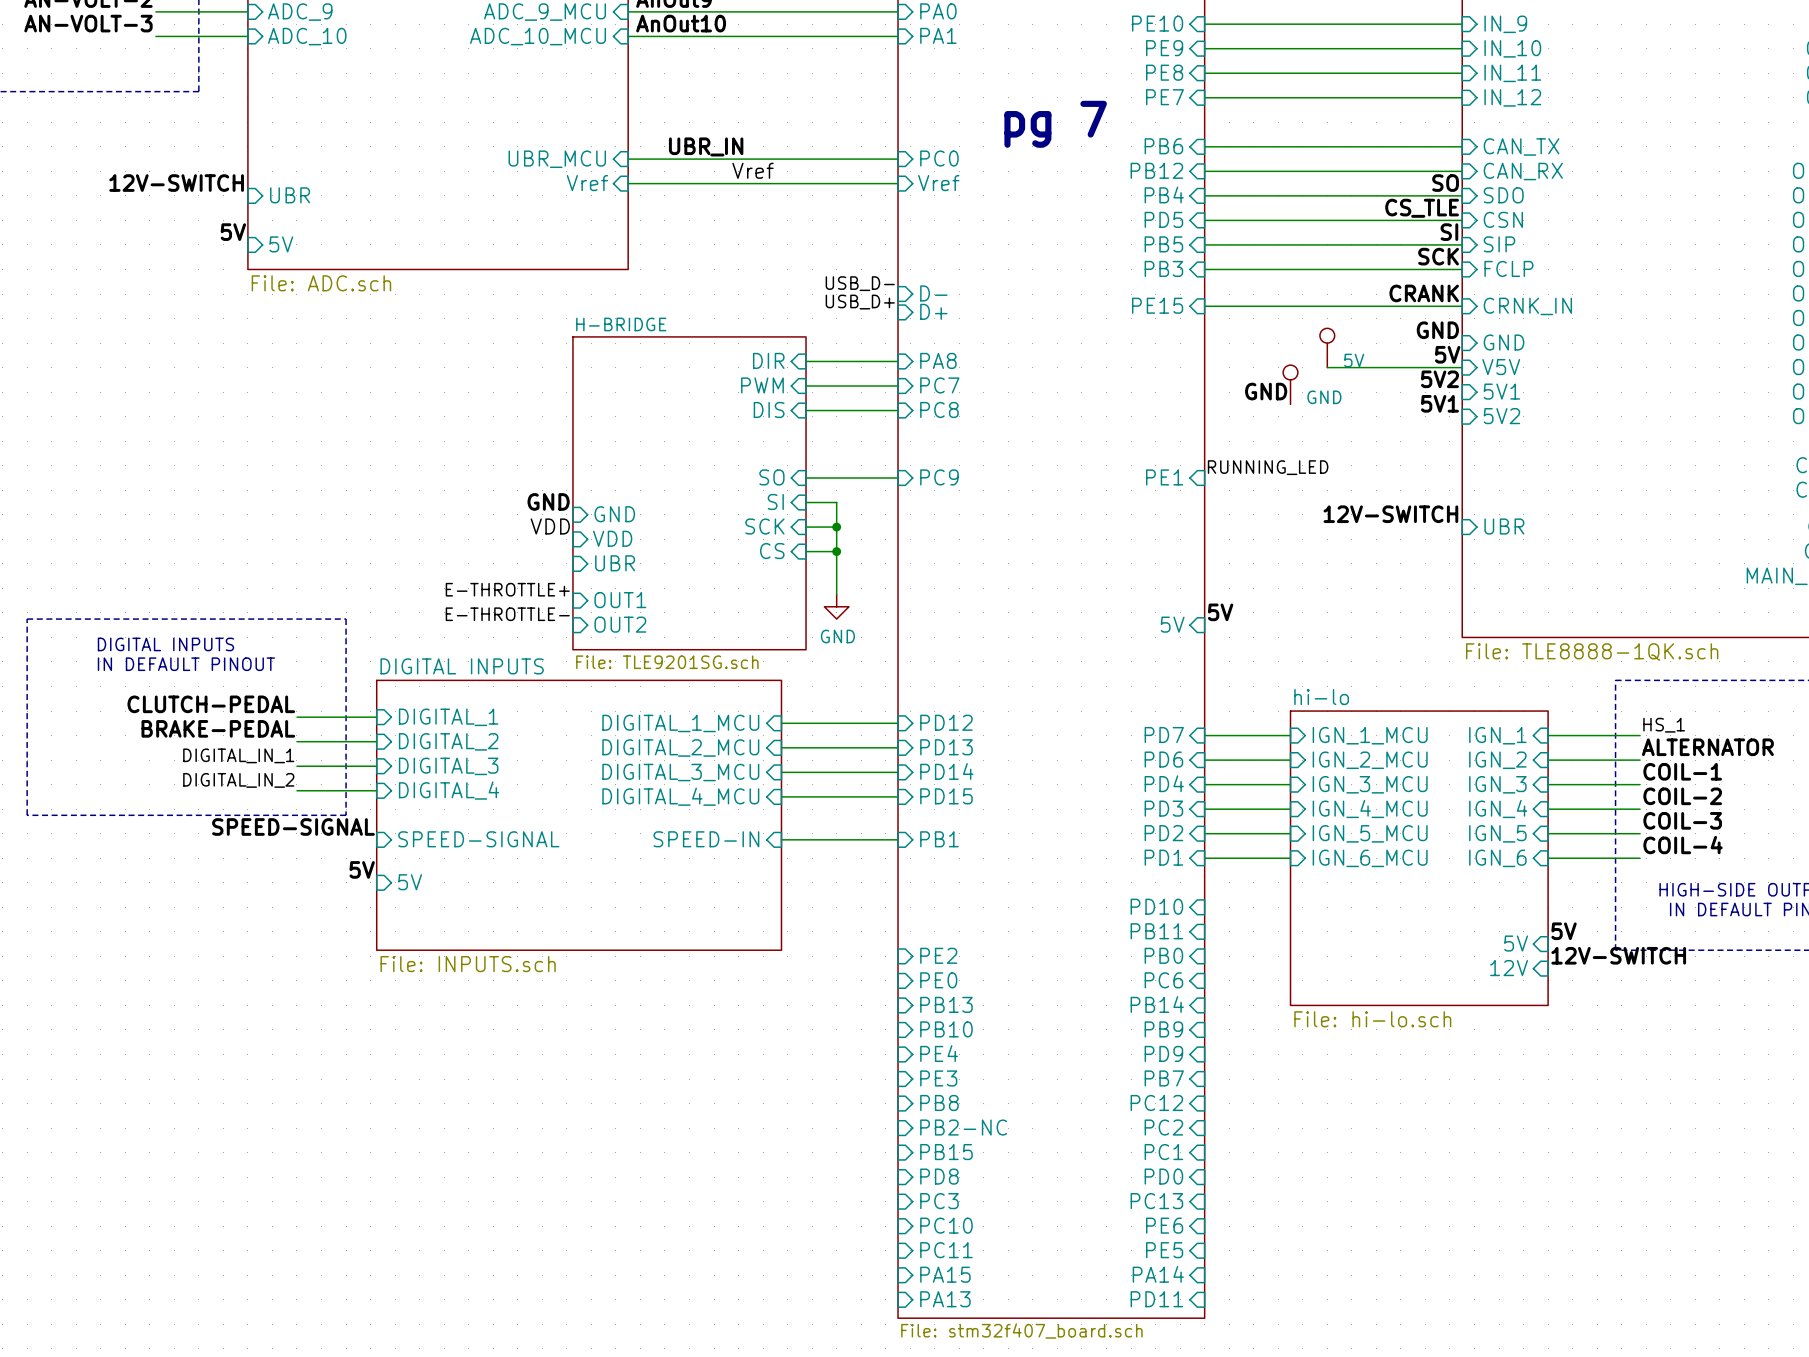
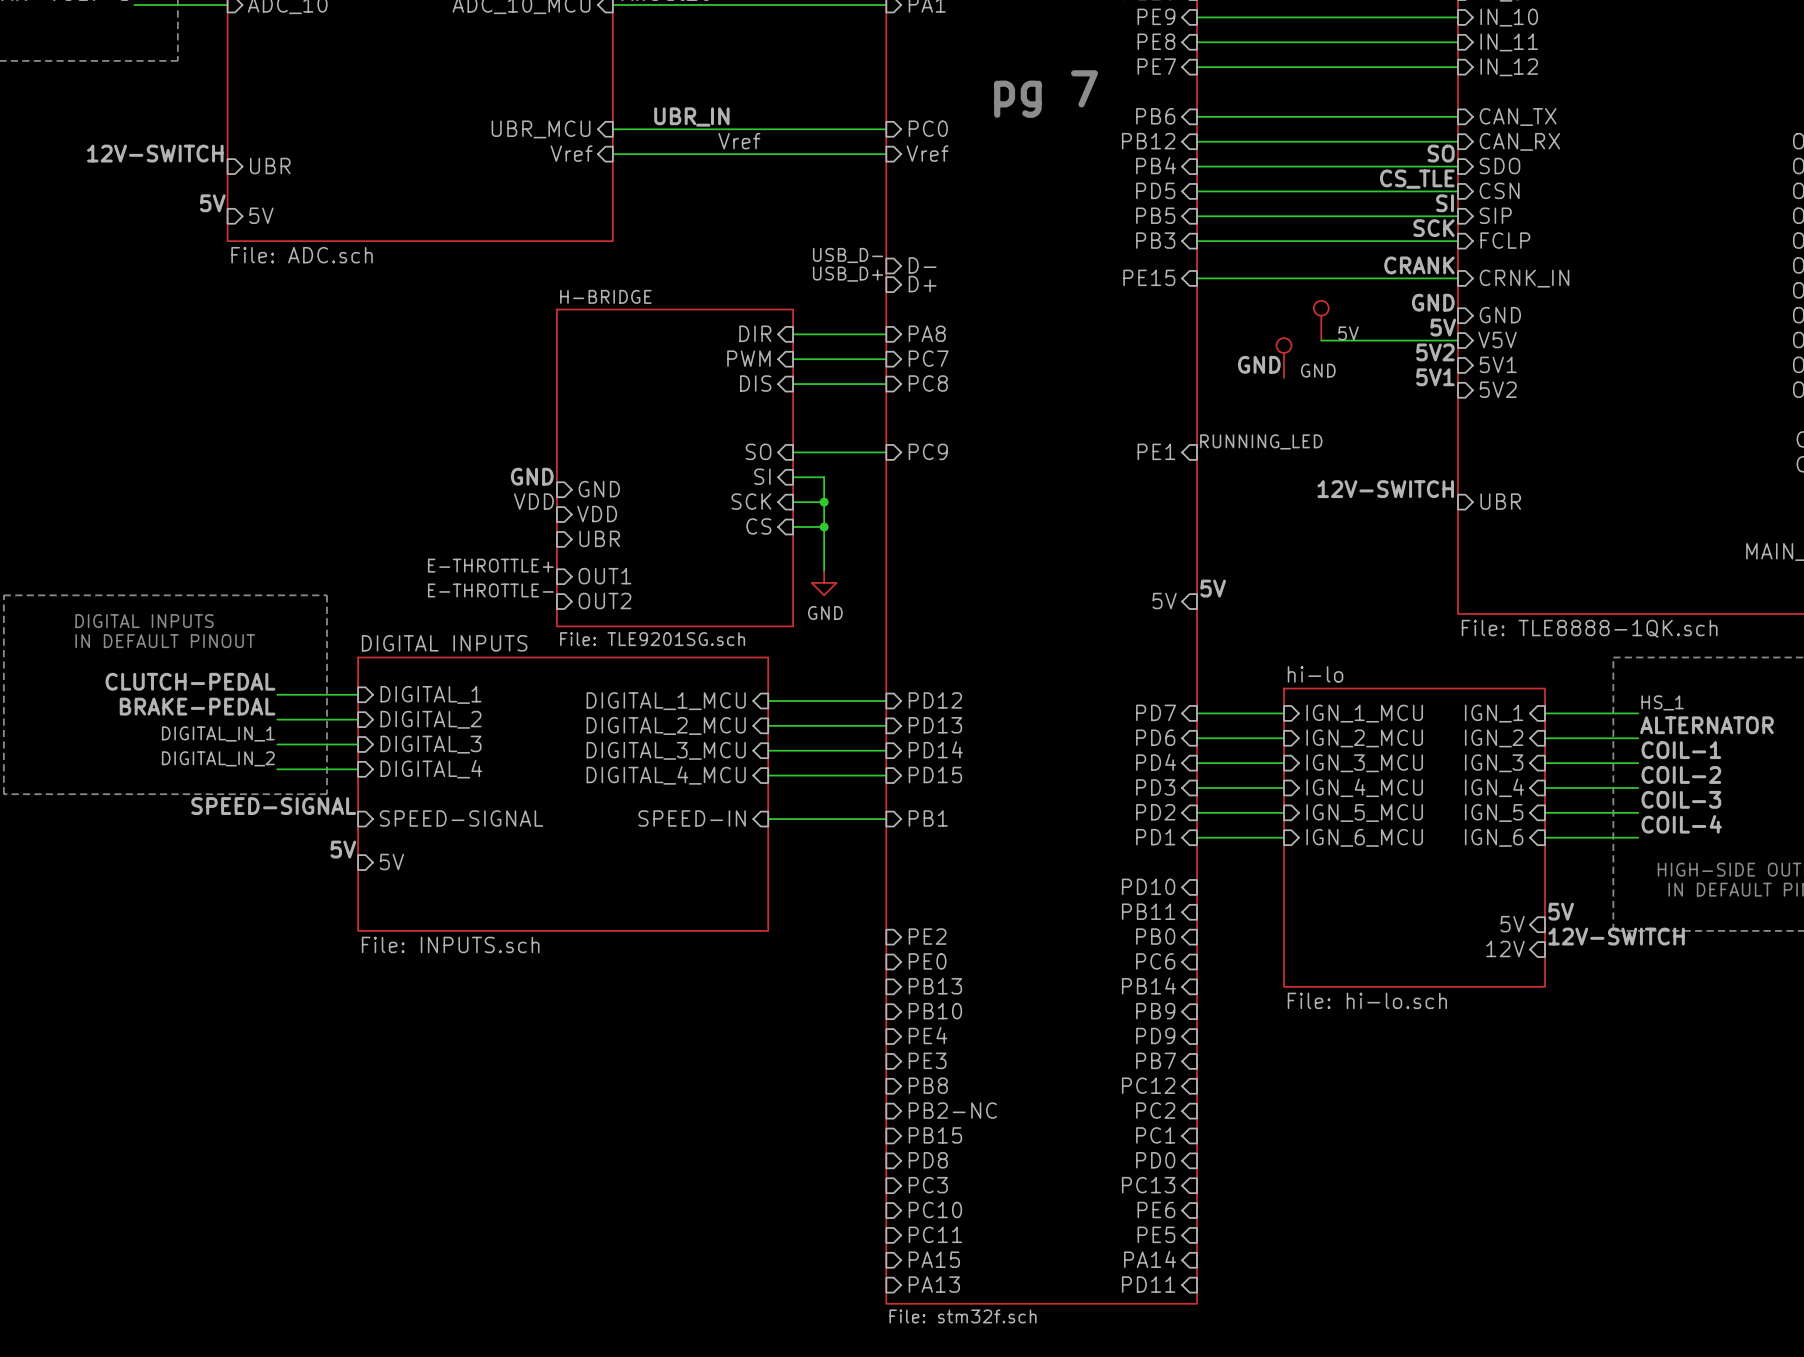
sheet value: File: stm32f407_board.sch (1021, 1331) -> File: stm32f.sch (963, 1316)

